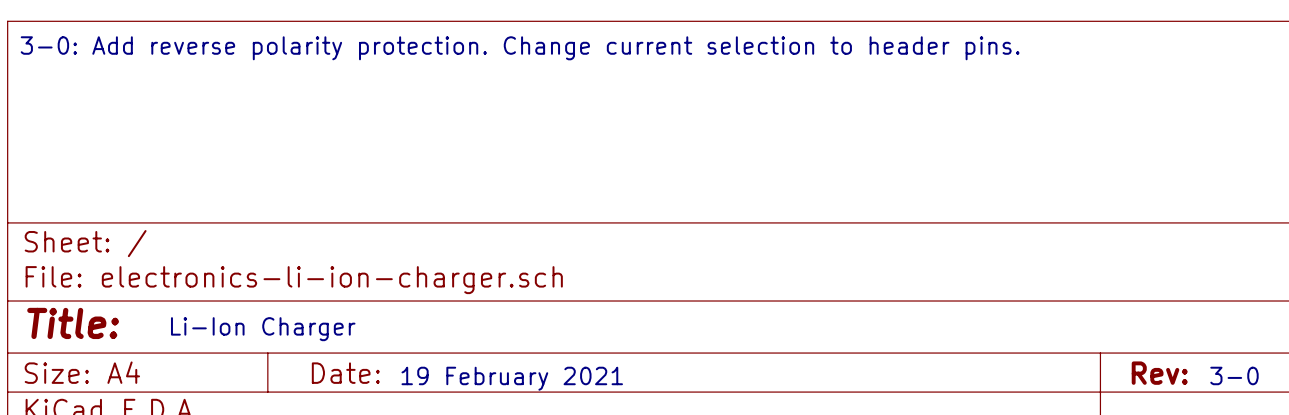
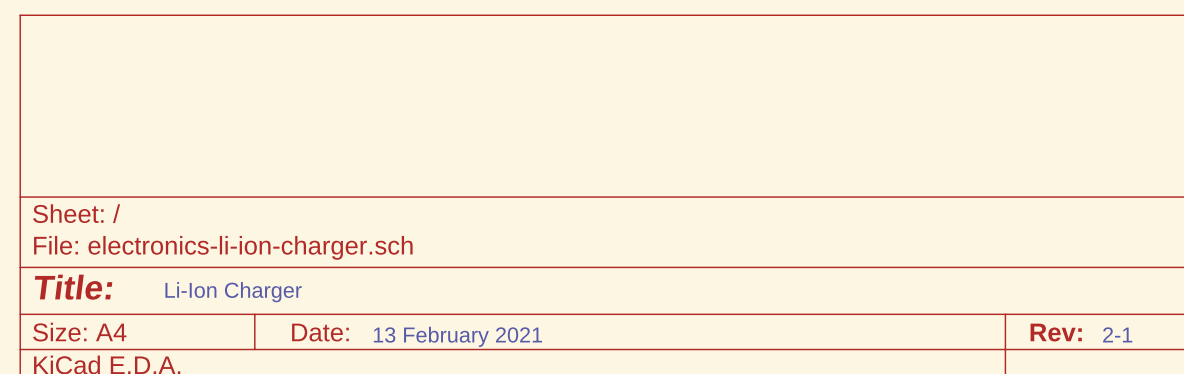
text: 3-0: Add reverse polarity protection. Change current selection to header pins. (520, 48) -> none
text: 3-0 (1234, 375) -> 2-1 (1117, 334)
text: 19 February 2021 (512, 378) -> 13 February 2021 (457, 336)

